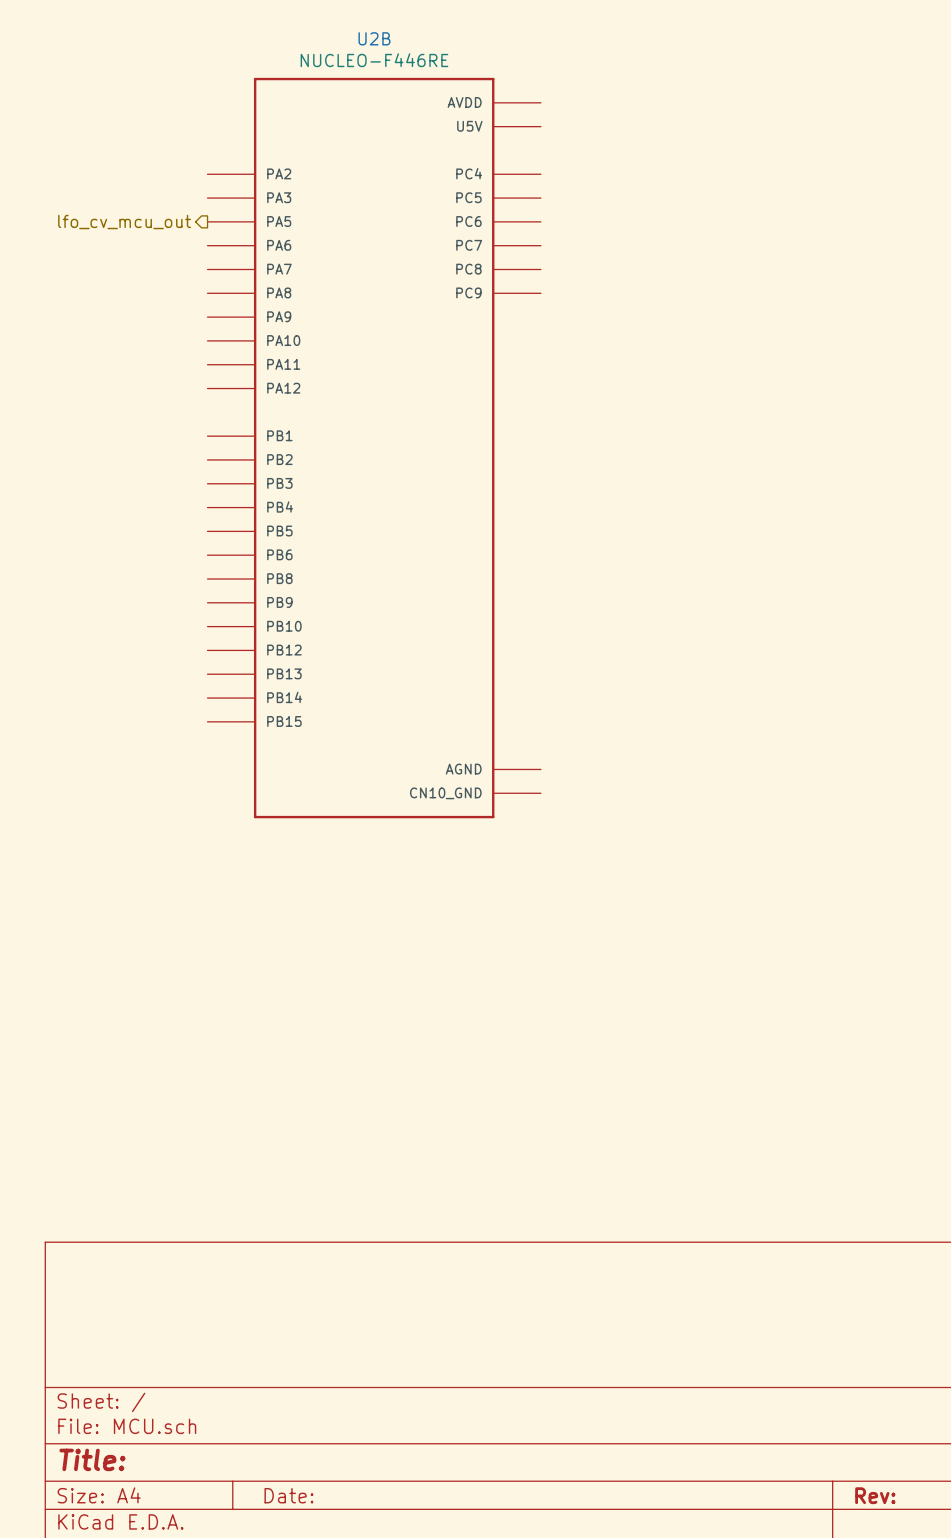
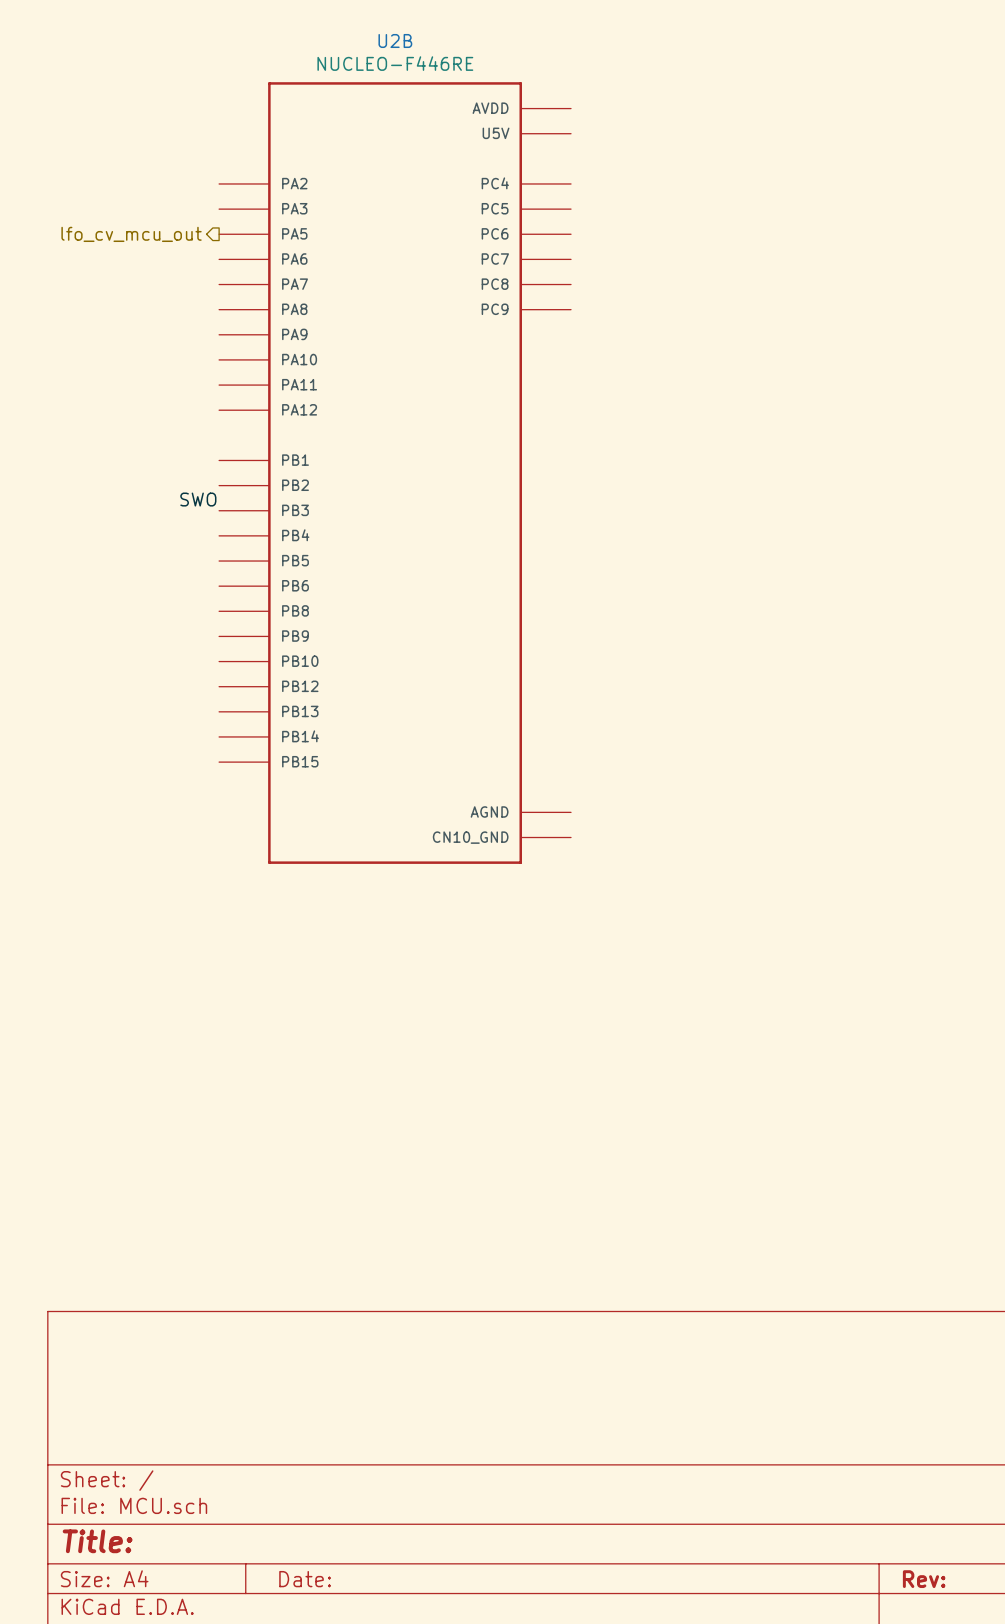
label: none -> SWO (198, 499)

